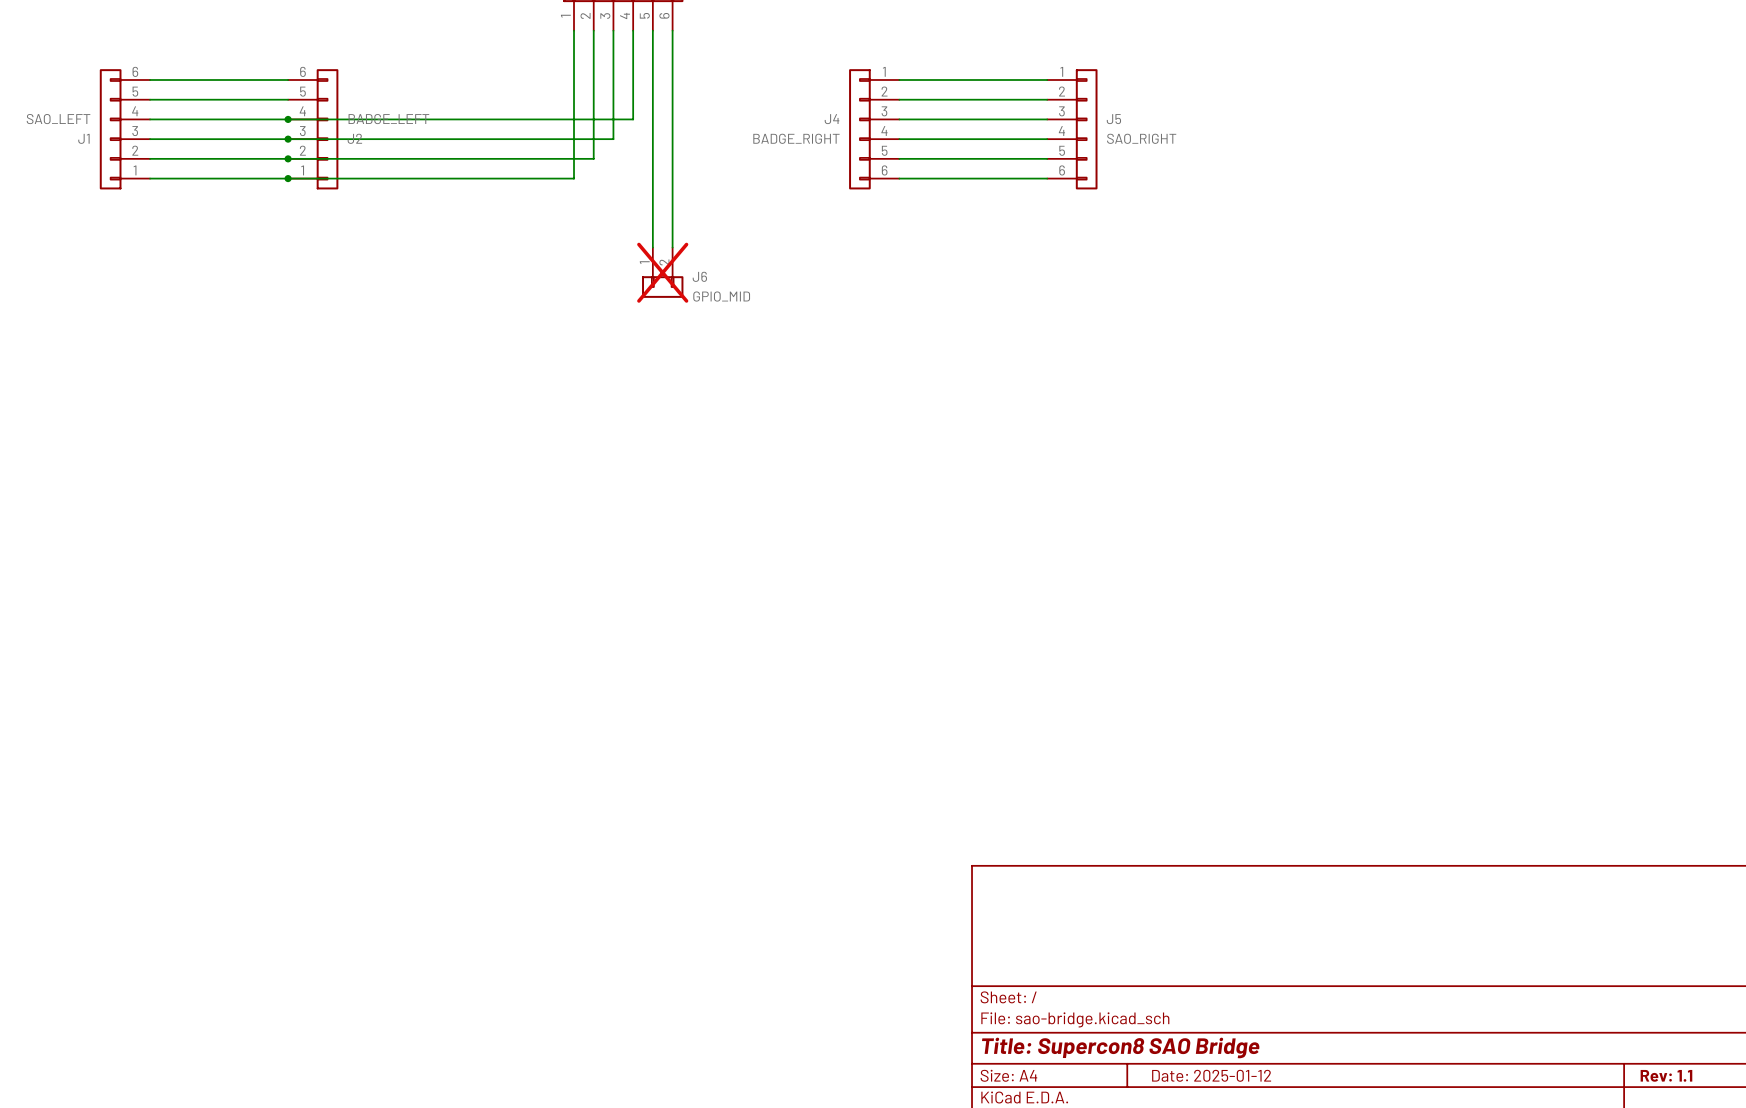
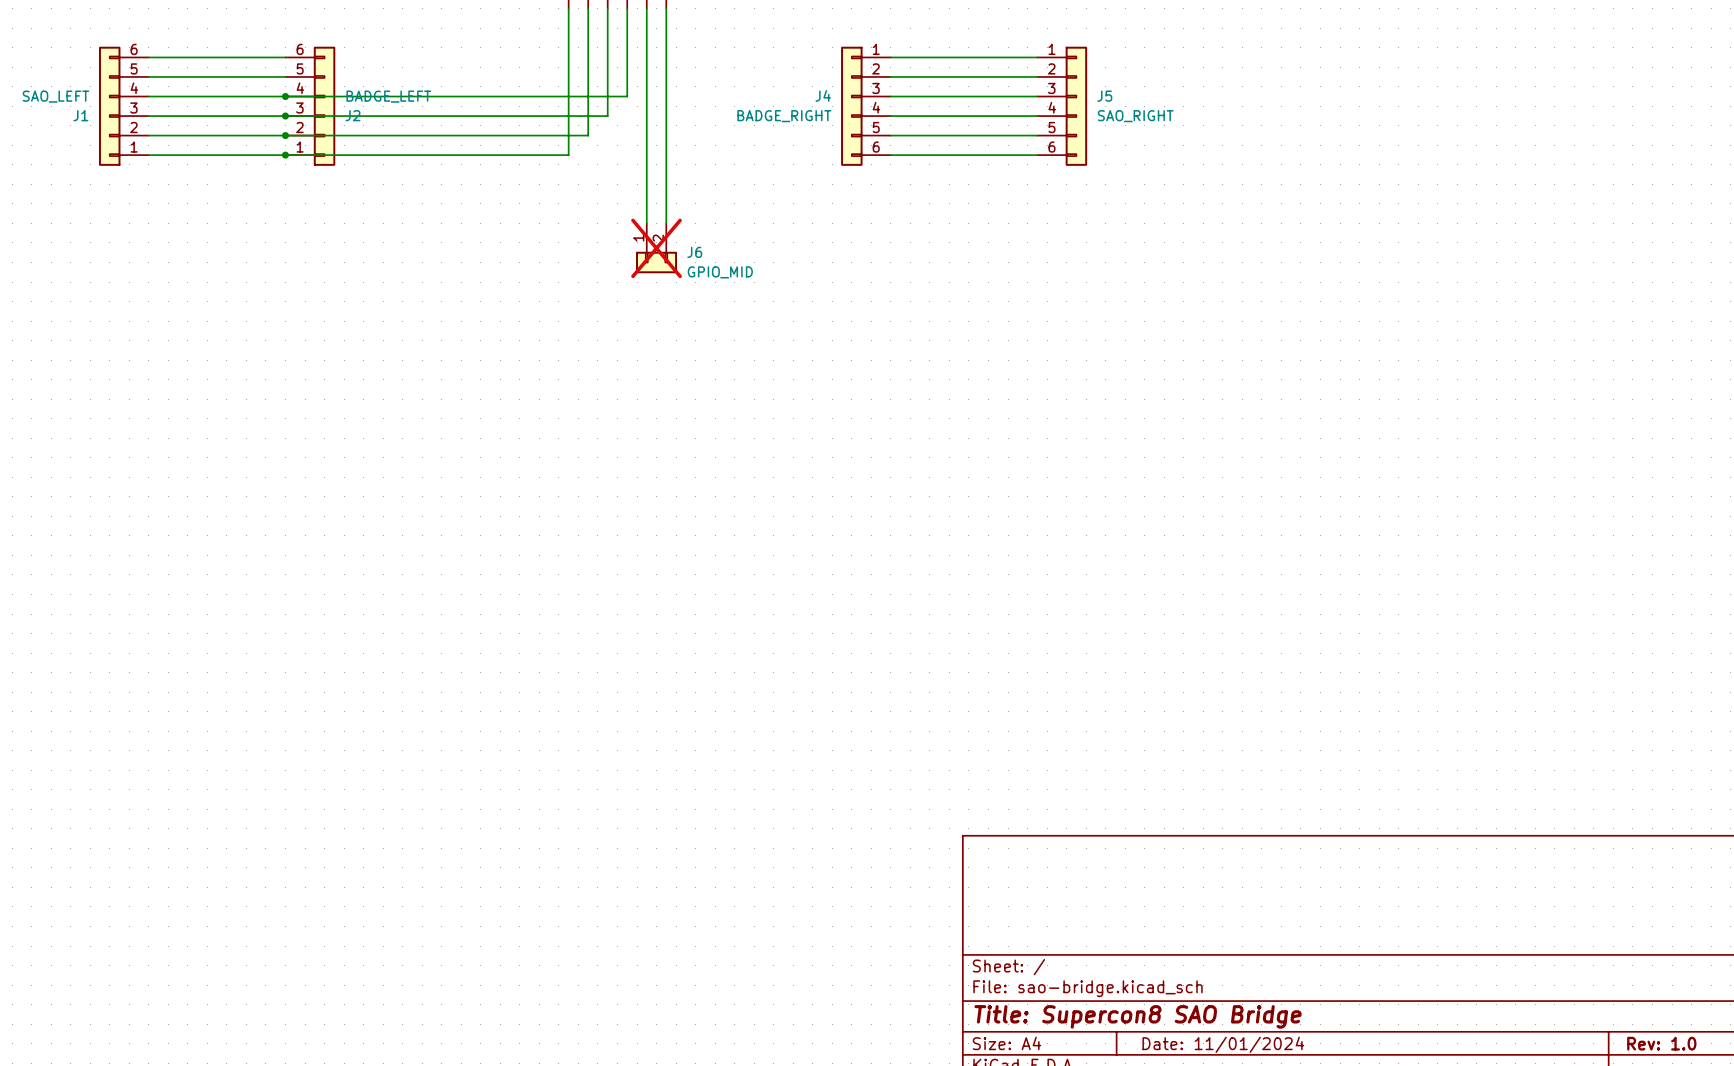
title block: Date: 2025-01-12 (1211, 1075) -> Date: 11/01/2024 (1223, 1044)
title block: Rev: 1.1 (1666, 1075) -> Rev: 1.0 (1661, 1043)

